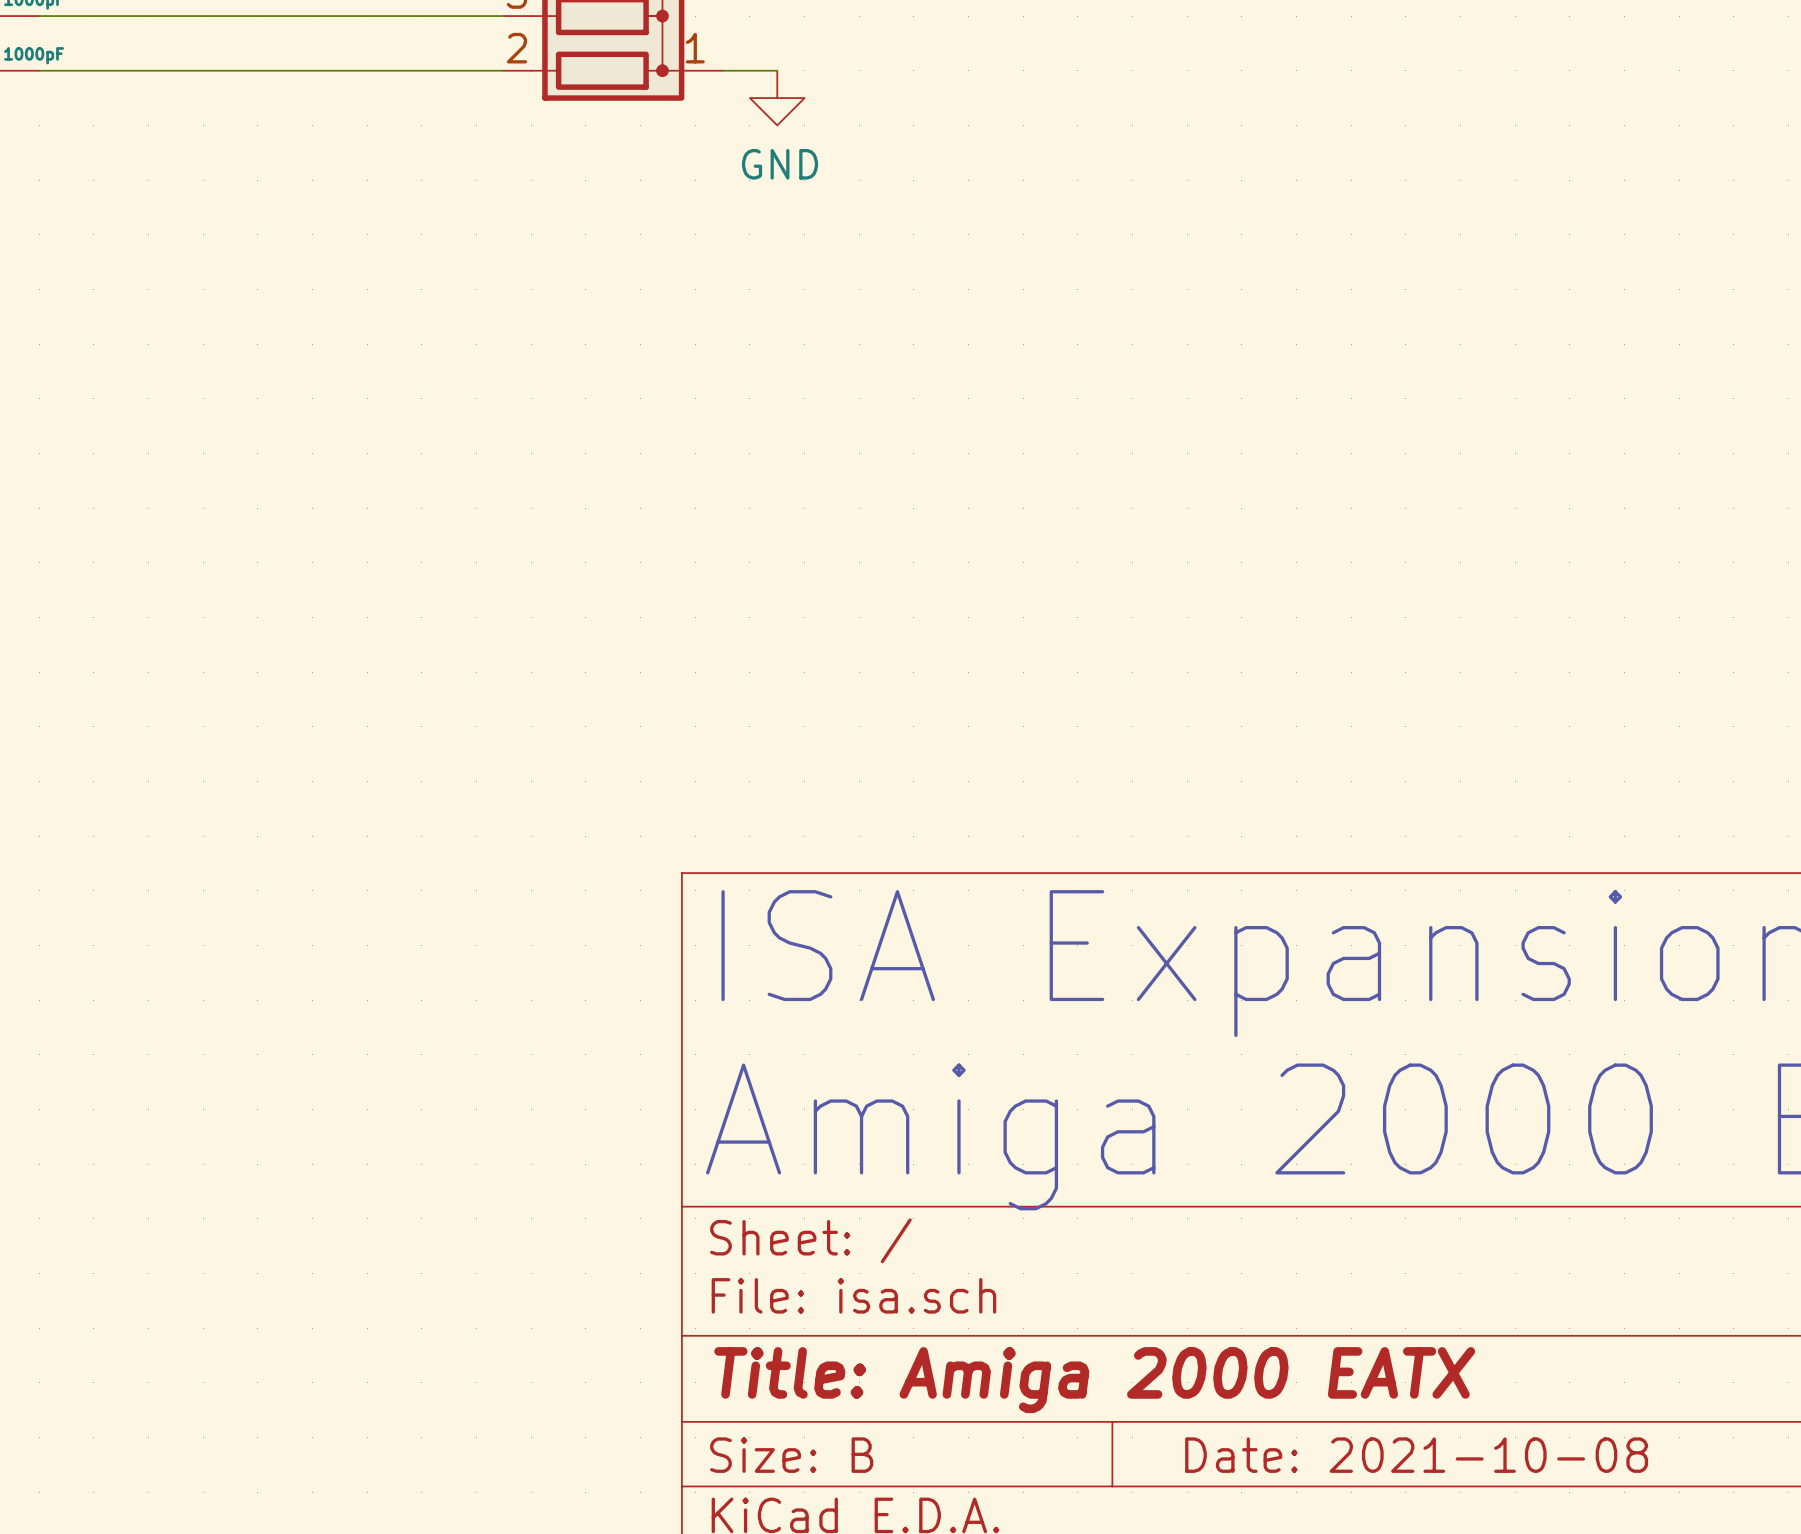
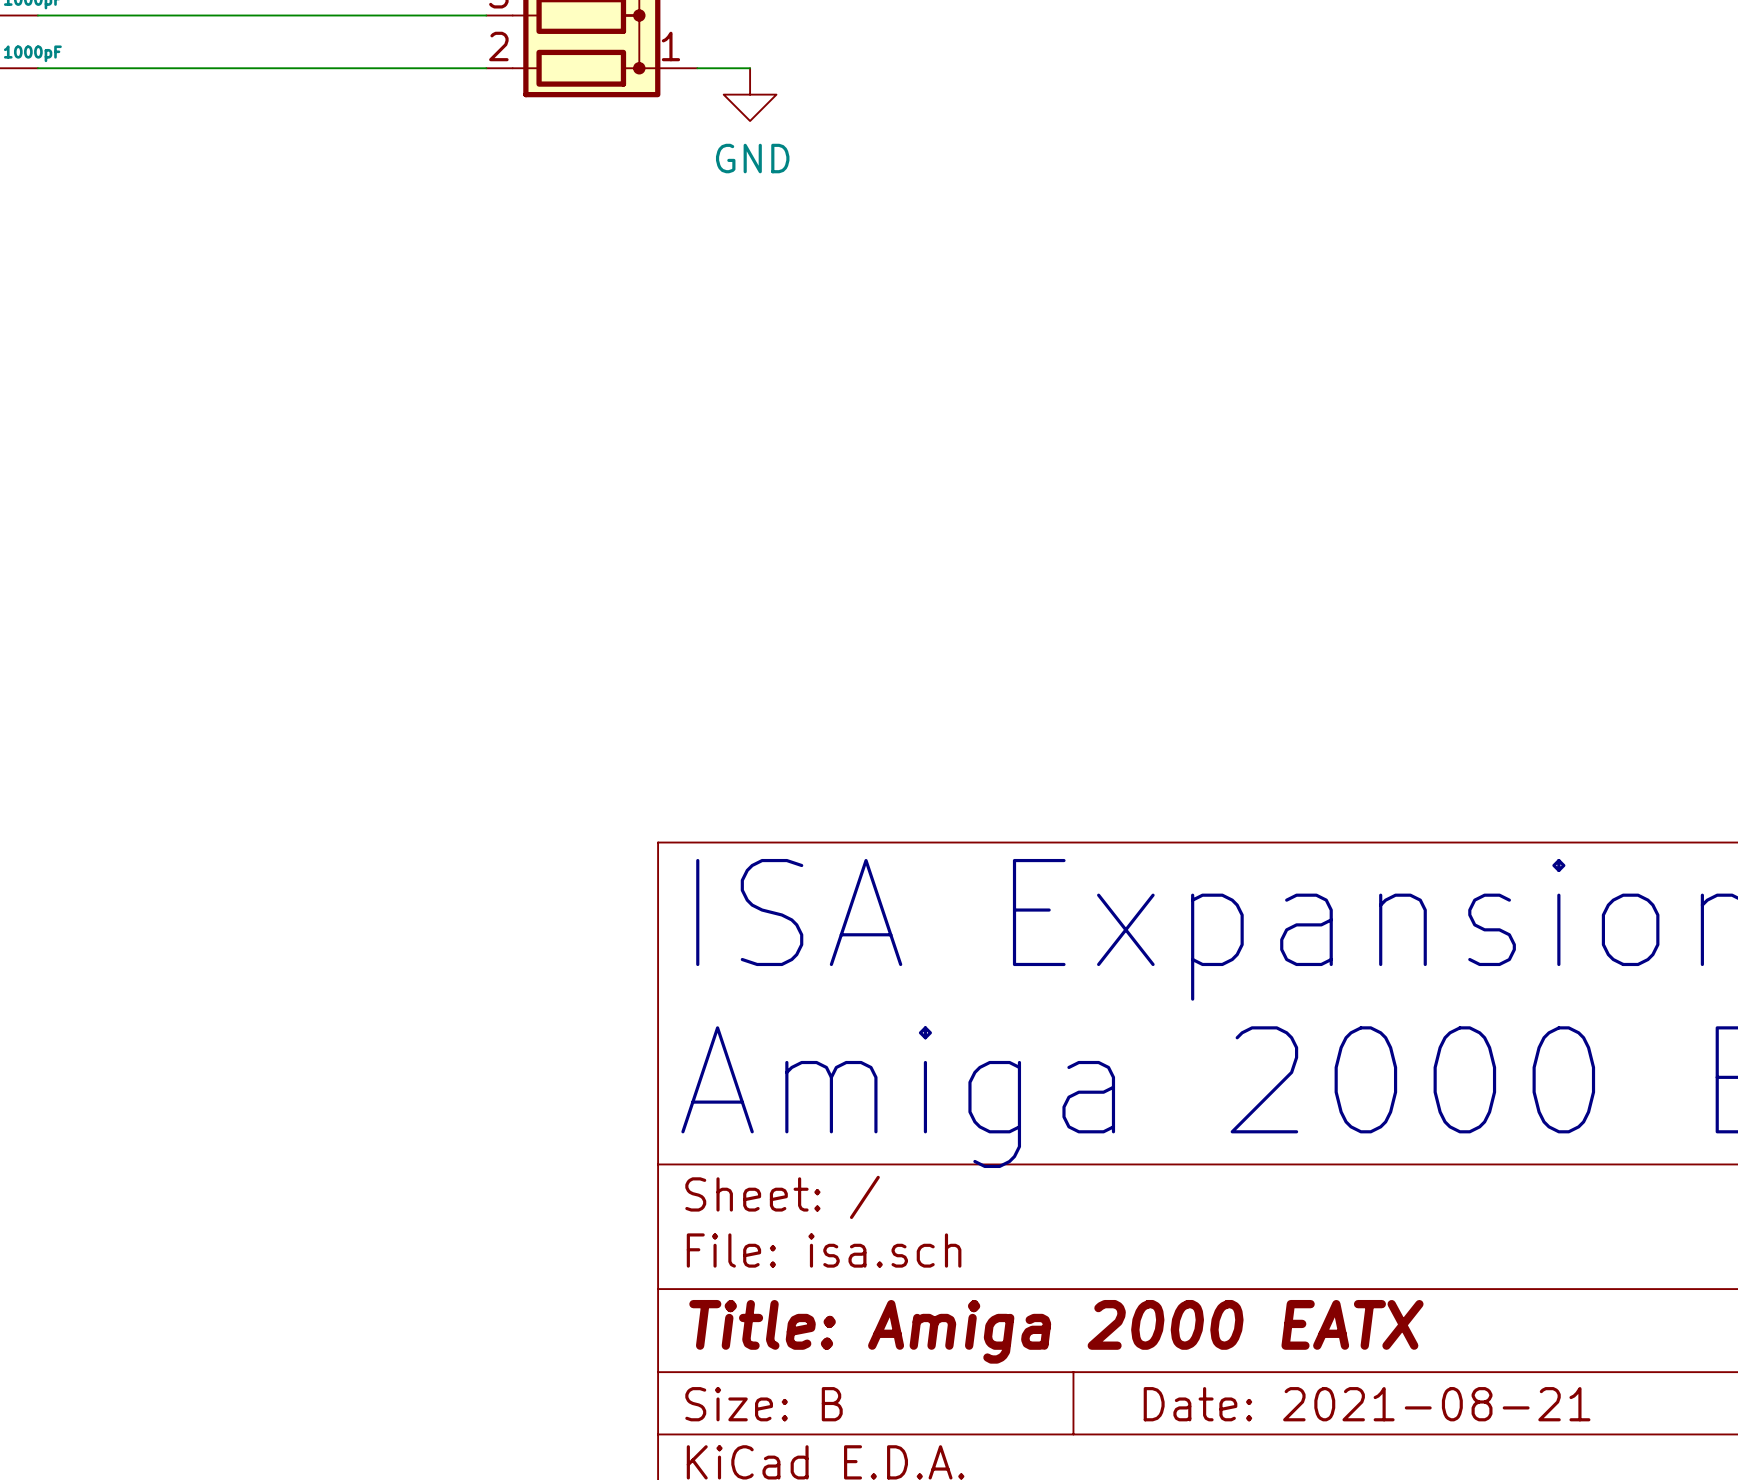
title block: Date: 2021-10-08 (1416, 1455) -> Date: 2021-08-21 (1367, 1404)

